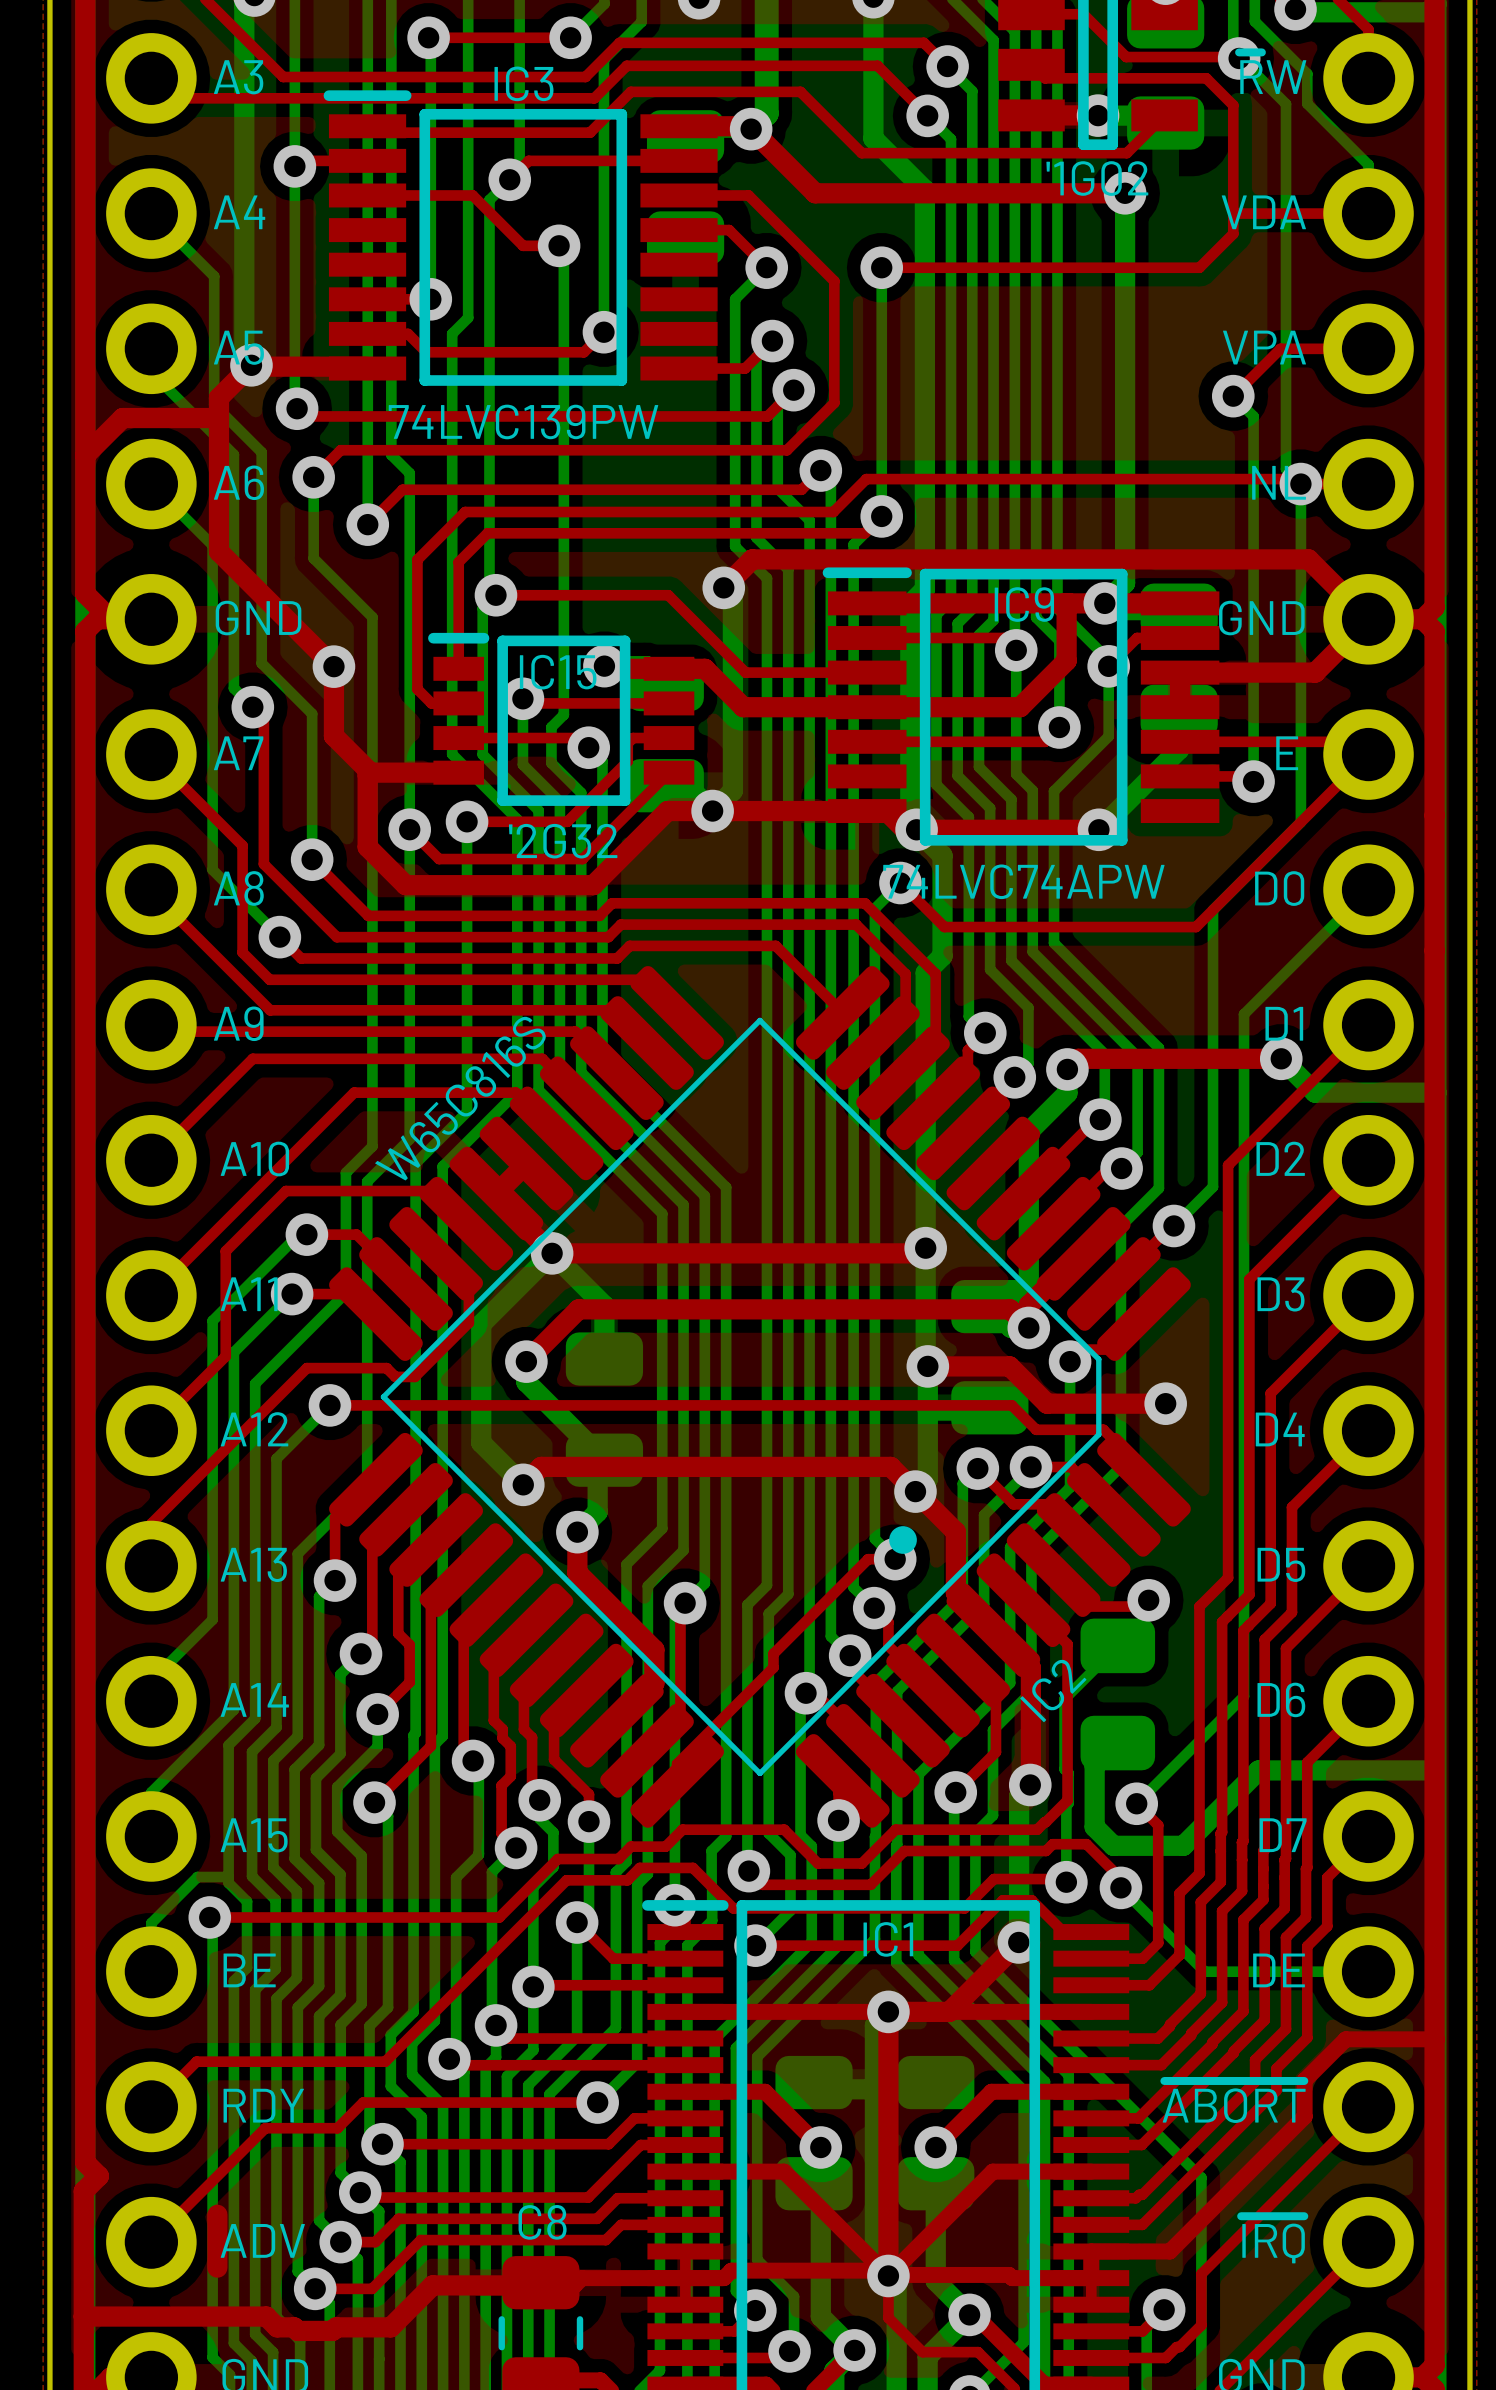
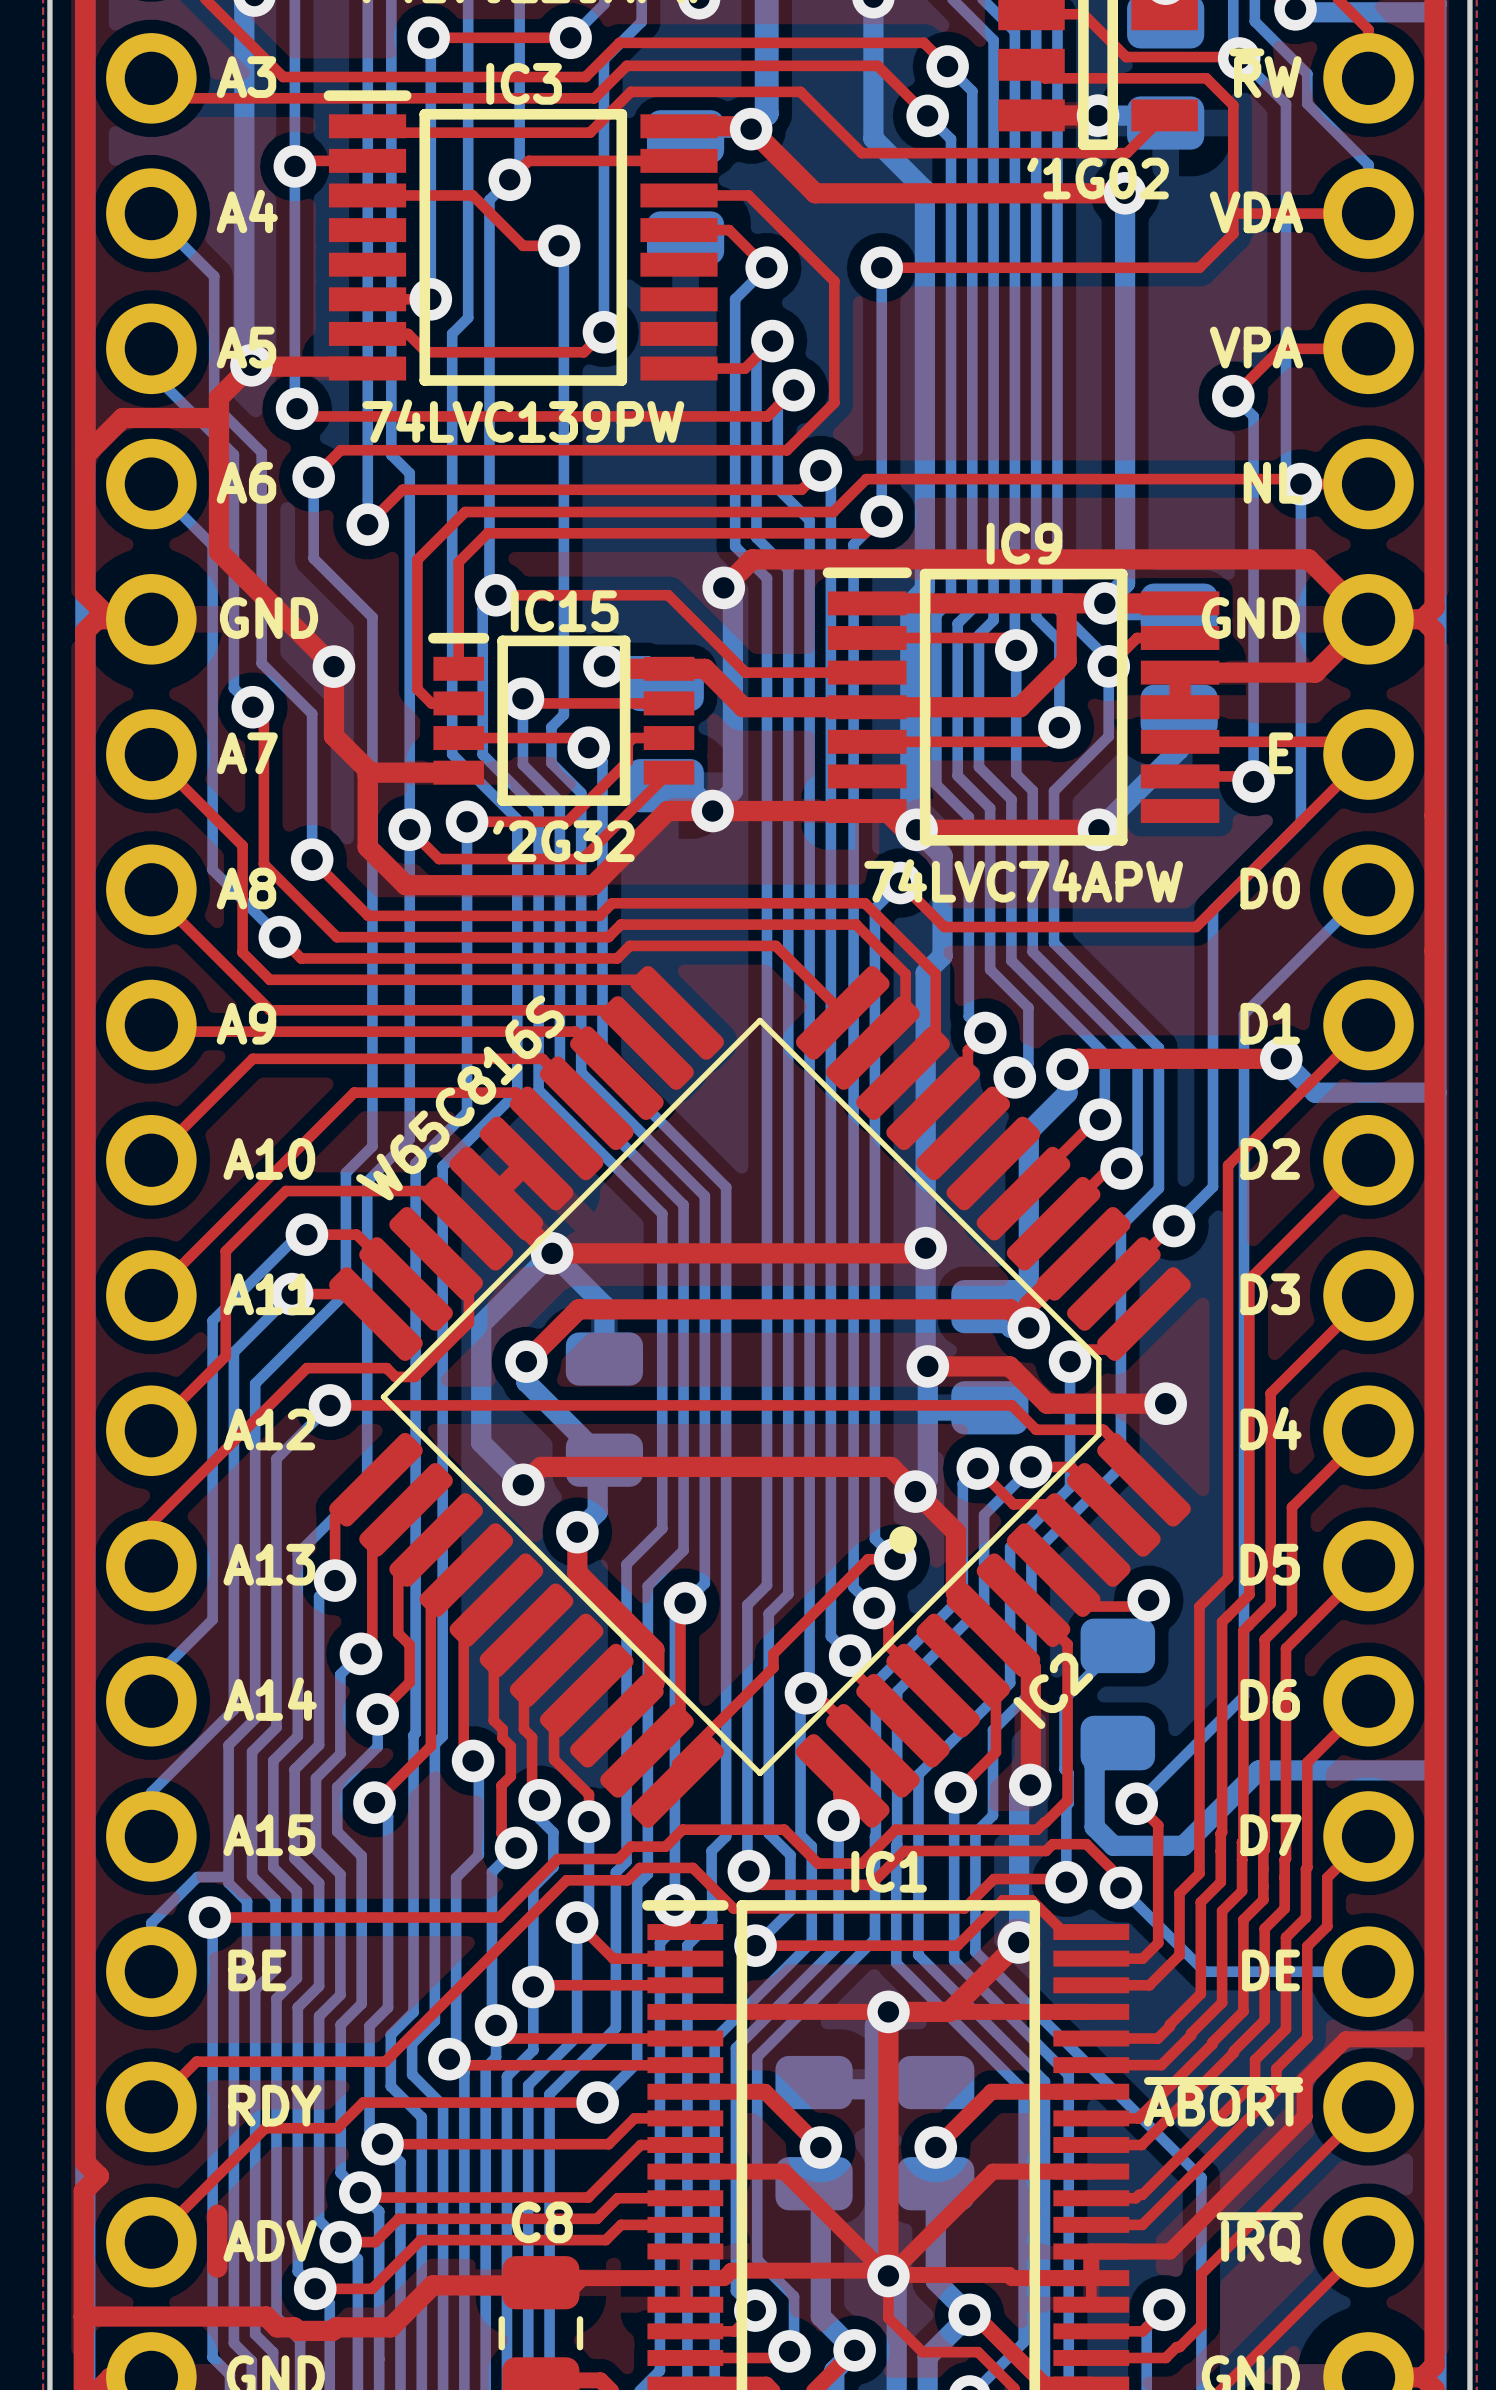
IC9 name position: IC9 (1024, 604) -> IC9 (1024, 543)
IC15 name position: IC15 (558, 672) -> IC15 (564, 611)
IC1 name position: IC1 (888, 1939) -> IC1 (889, 1871)

